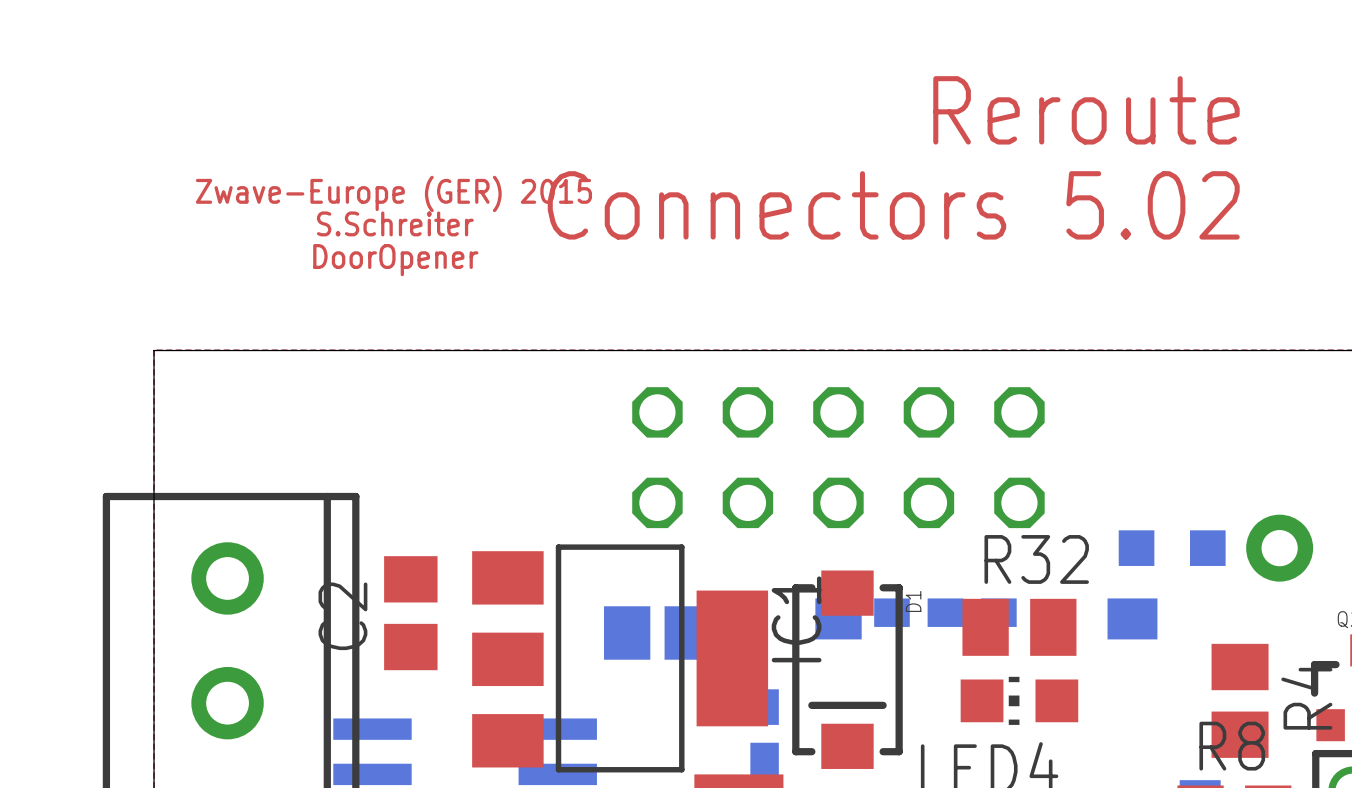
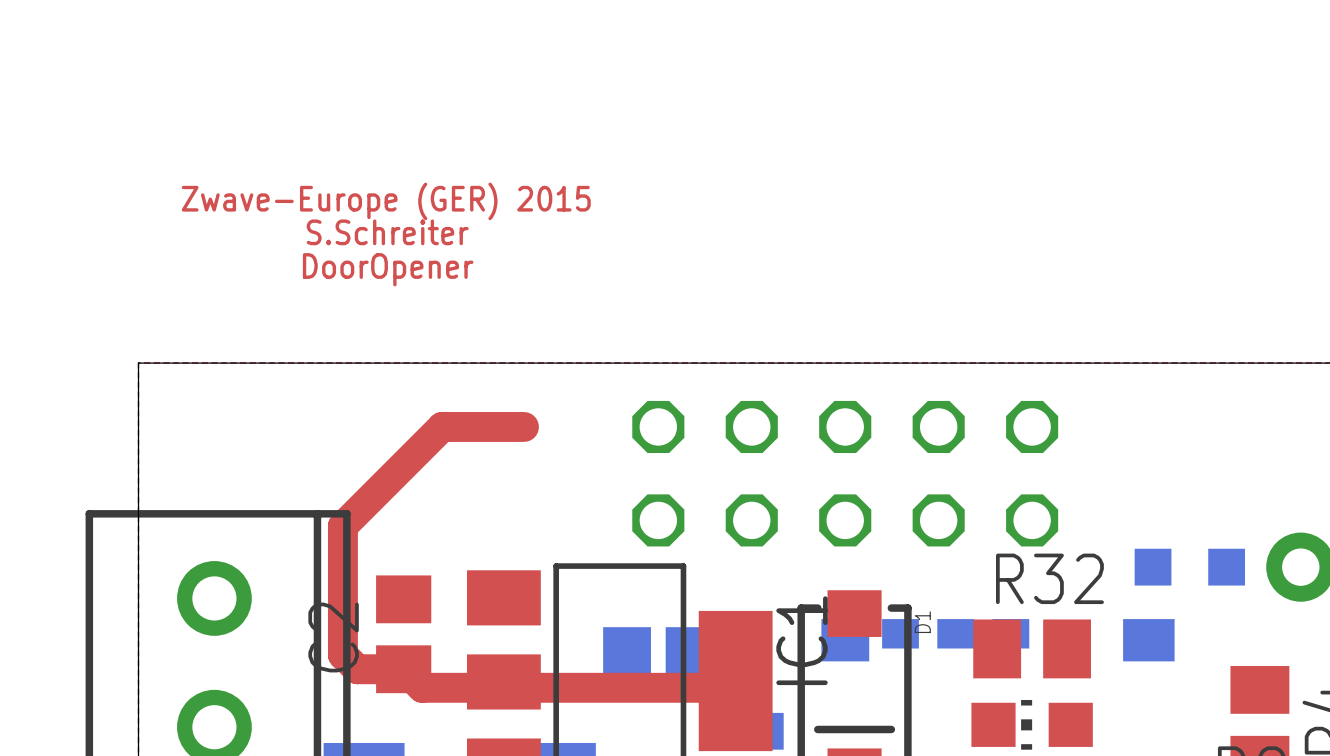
text: Reroute (1086, 110) -> none
text: Connectors 5.02 (893, 205) -> none
top track: none -> (523, 426) (442, 426) (342, 526) (342, 654) (357, 669) (403, 669) (422, 687) (735, 686)

